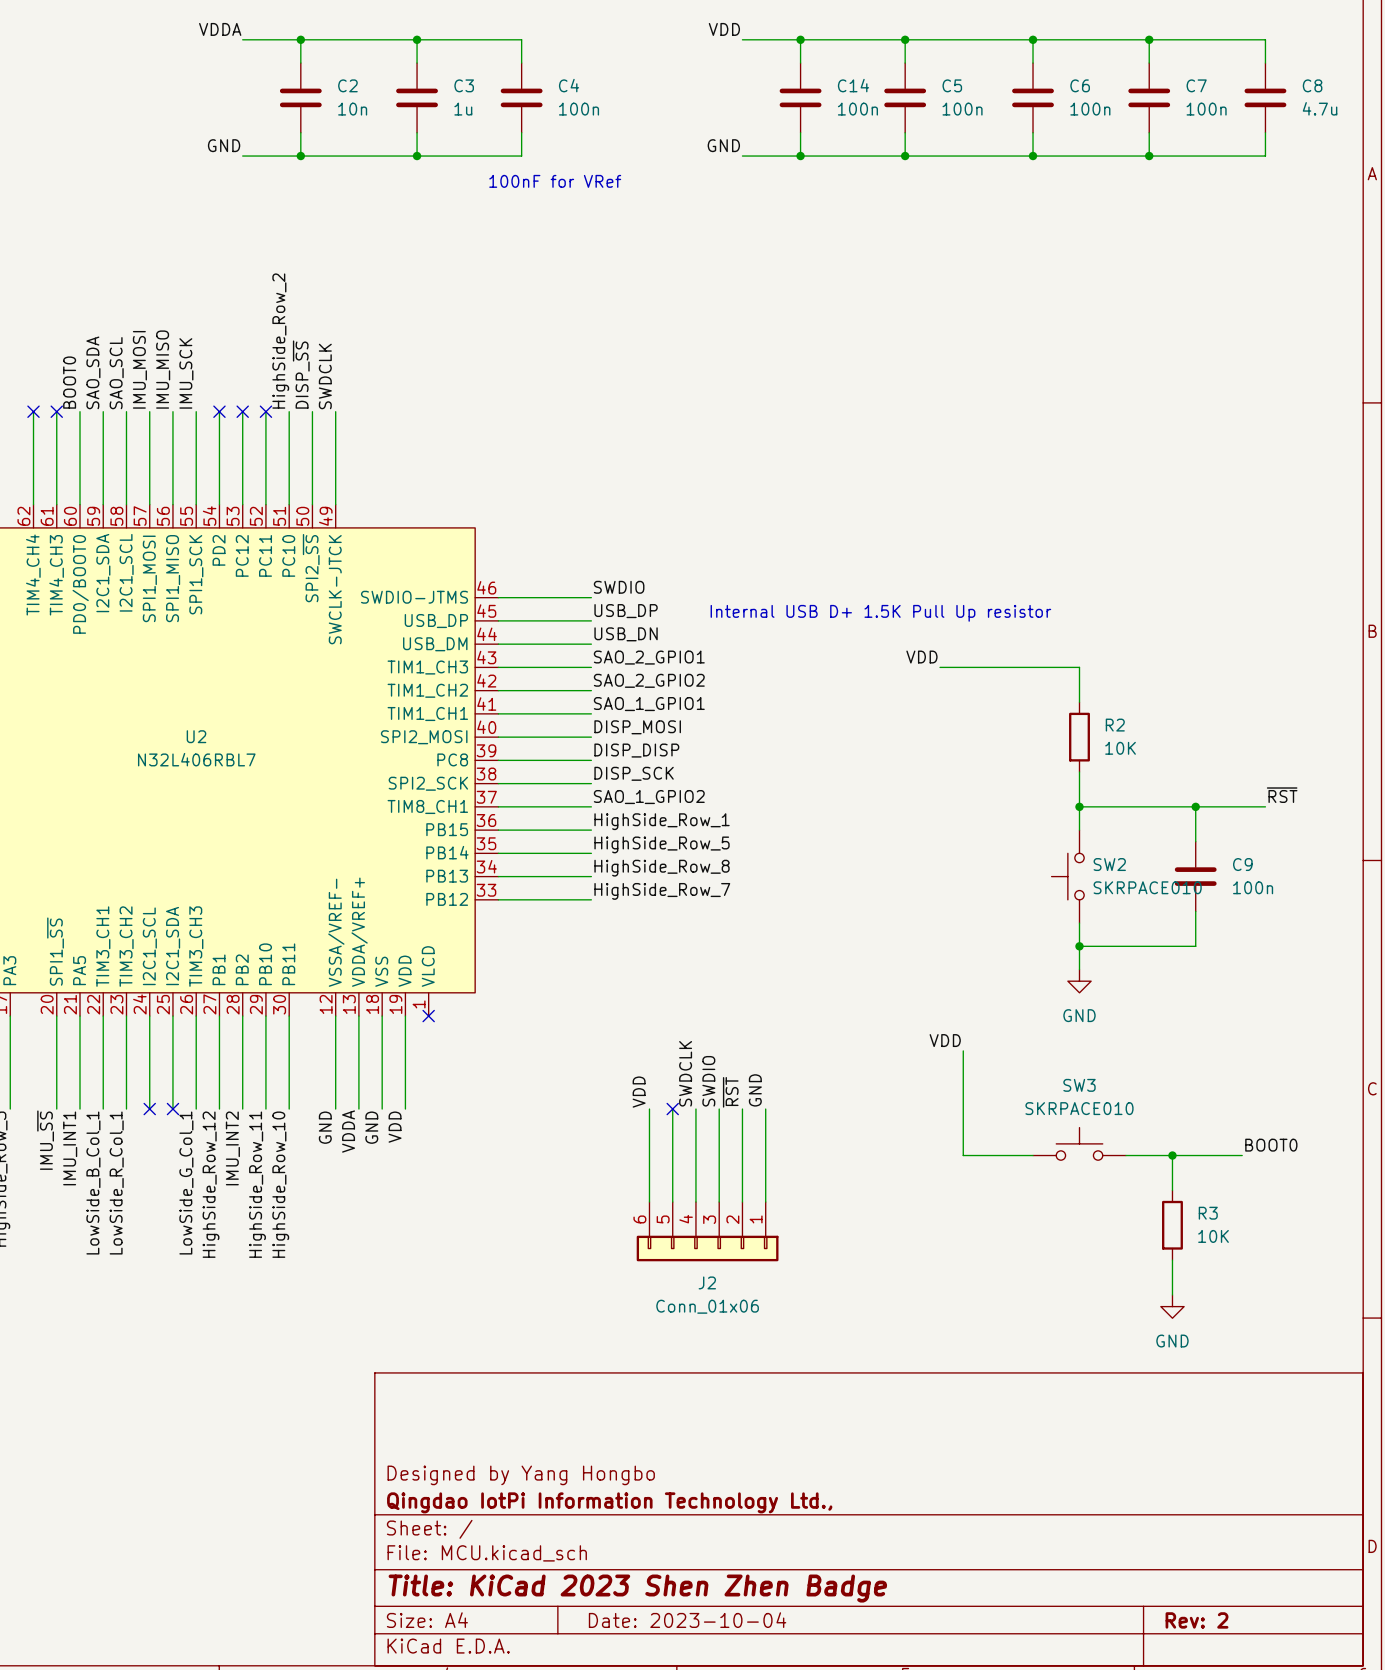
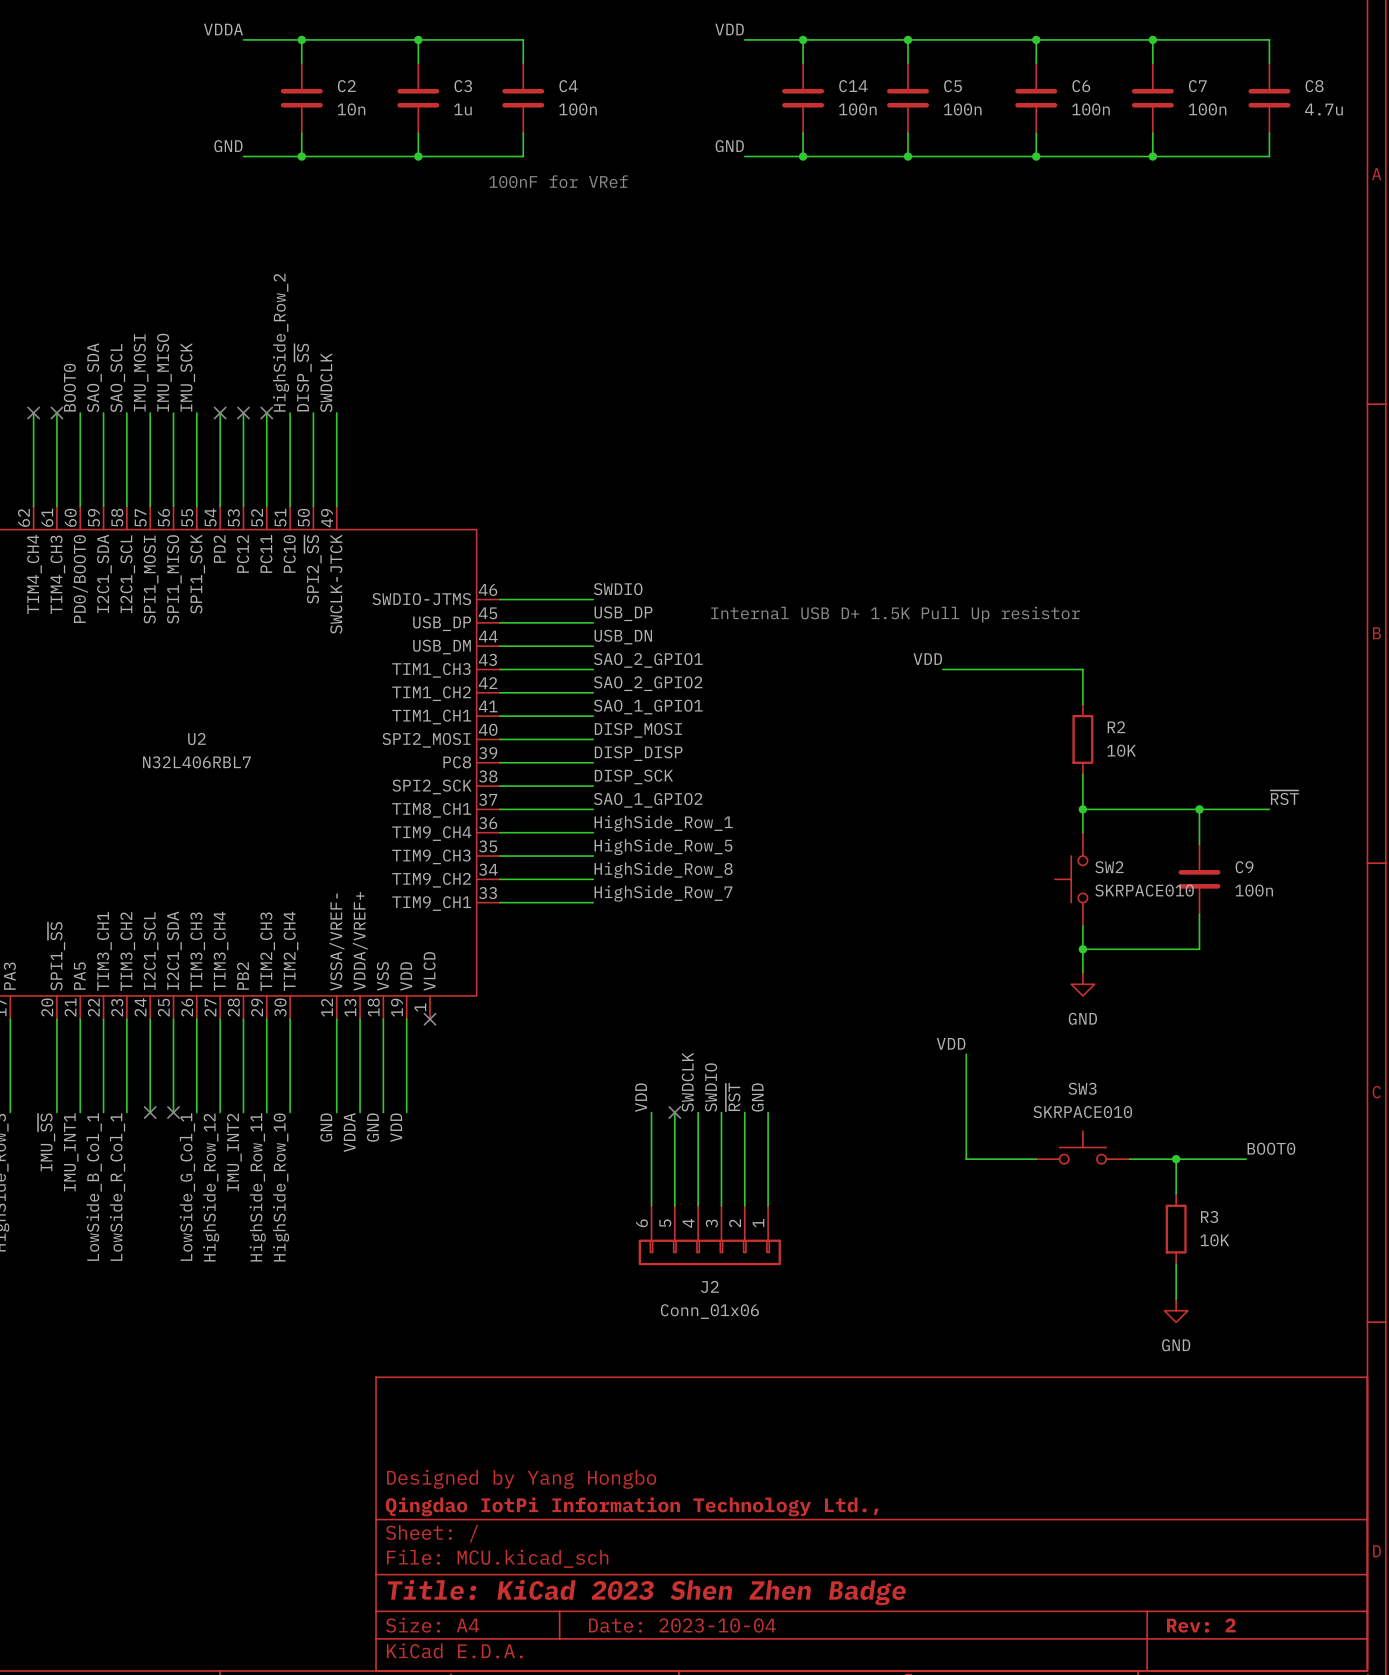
U2 pin name: PB15 (447, 829) -> TIM9_CH4 (431, 833)
U2 pin name: PB14 (447, 852) -> TIM9_CH3 (431, 856)
U2 pin name: PB13 (447, 876) -> TIM9_CH2 (431, 880)
U2 pin name: PB12 (447, 899) -> TIM9_CH1 (431, 903)
U2 pin name: PB10 (265, 964) -> TIM2_CH3 (267, 951)
U2 pin name: PB11 (288, 964) -> TIM2_CH4 (290, 951)
U2 pin name: PB1 (219, 969) -> TIM3_CH4 (221, 951)

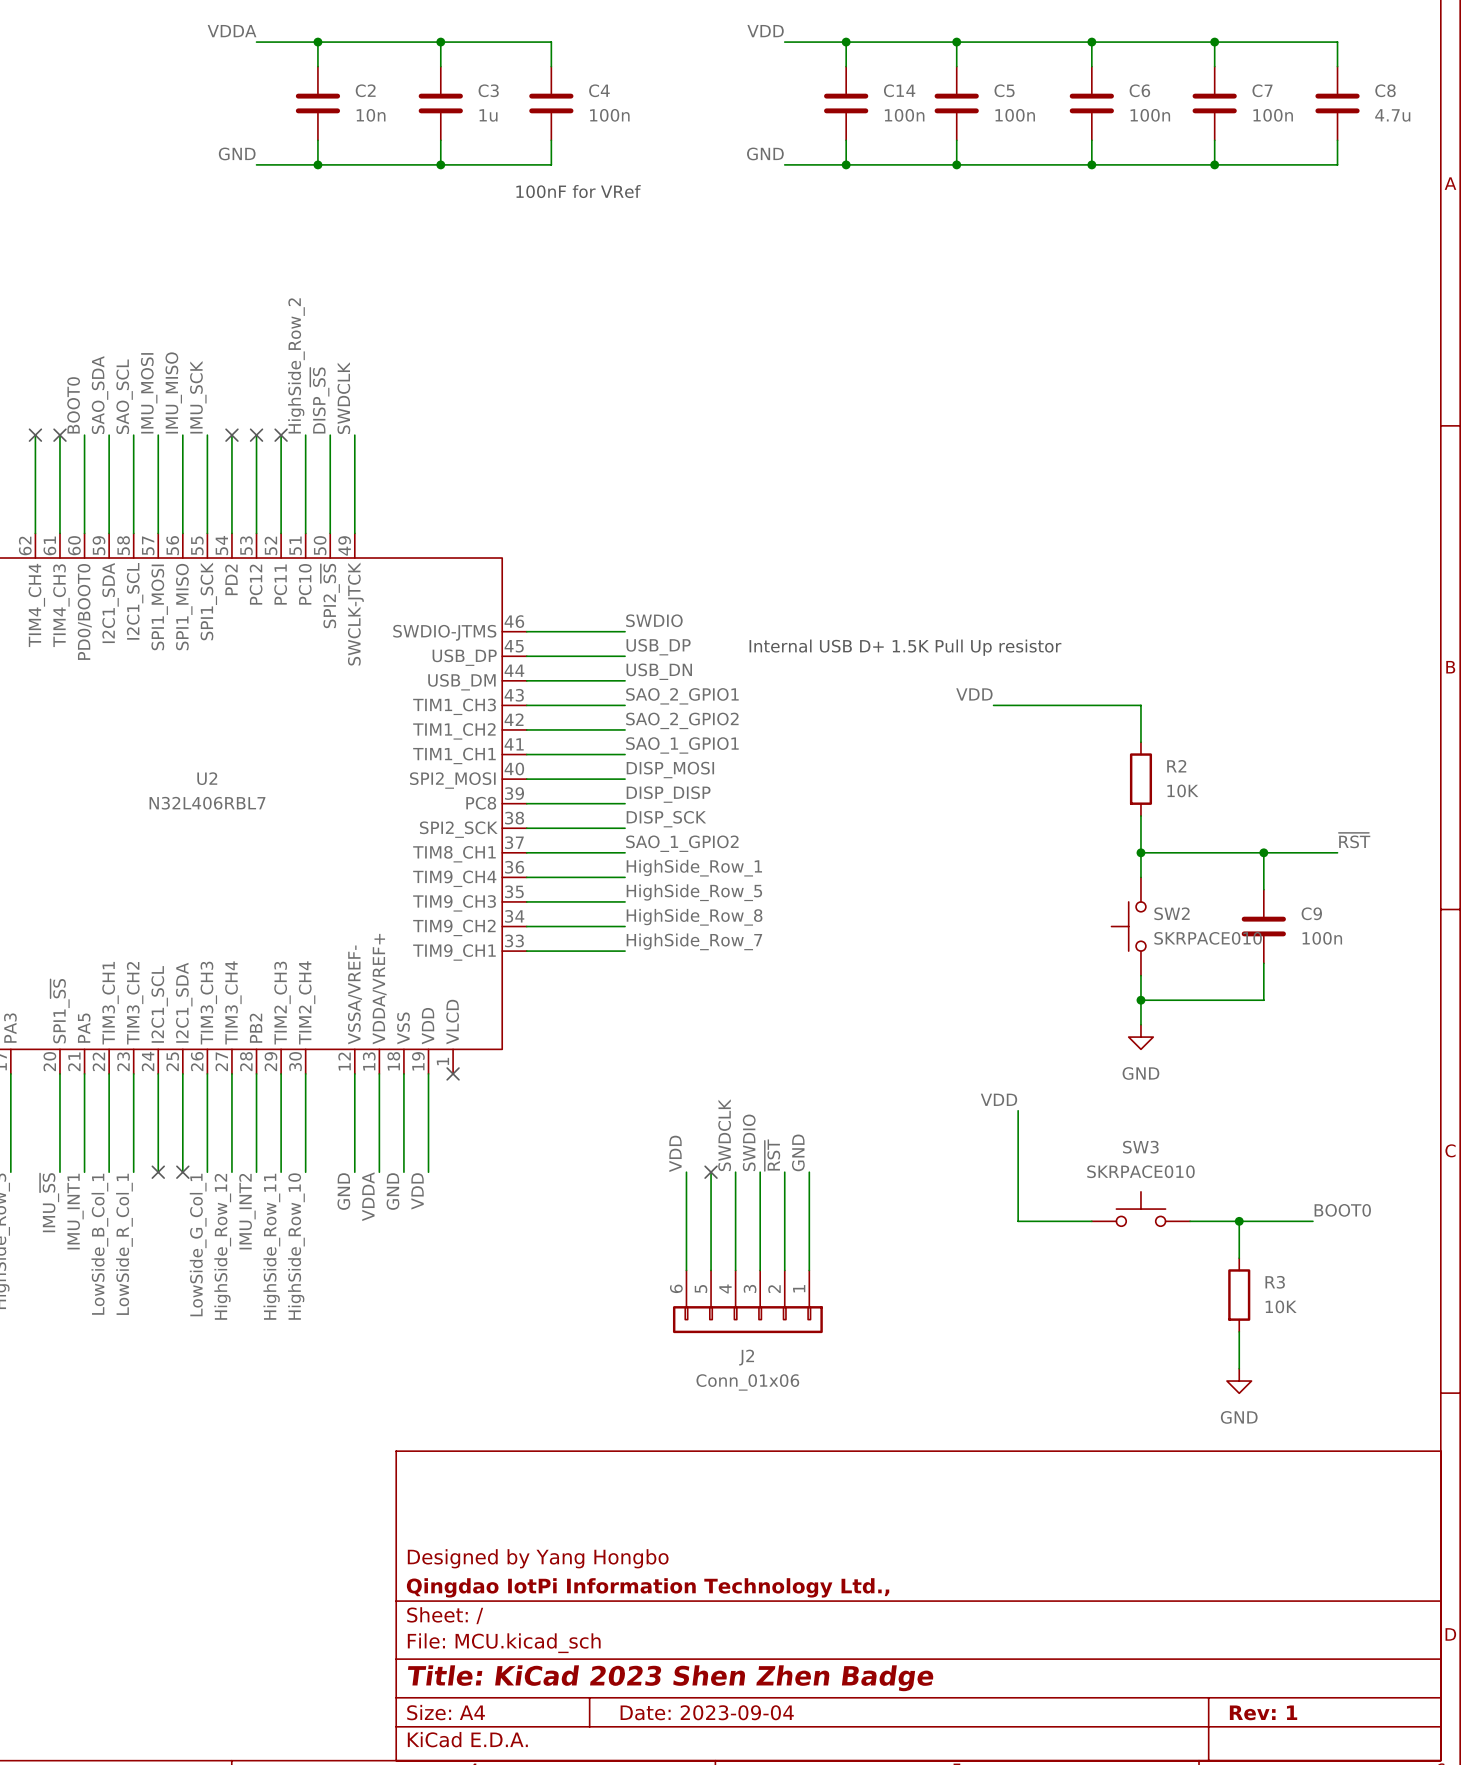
title block: Date: 2023-10-04 (682, 1625) -> Date: 2023-09-04 (707, 1712)
title block: Rev: 2 (1201, 1625) -> Rev: 1 (1263, 1712)

